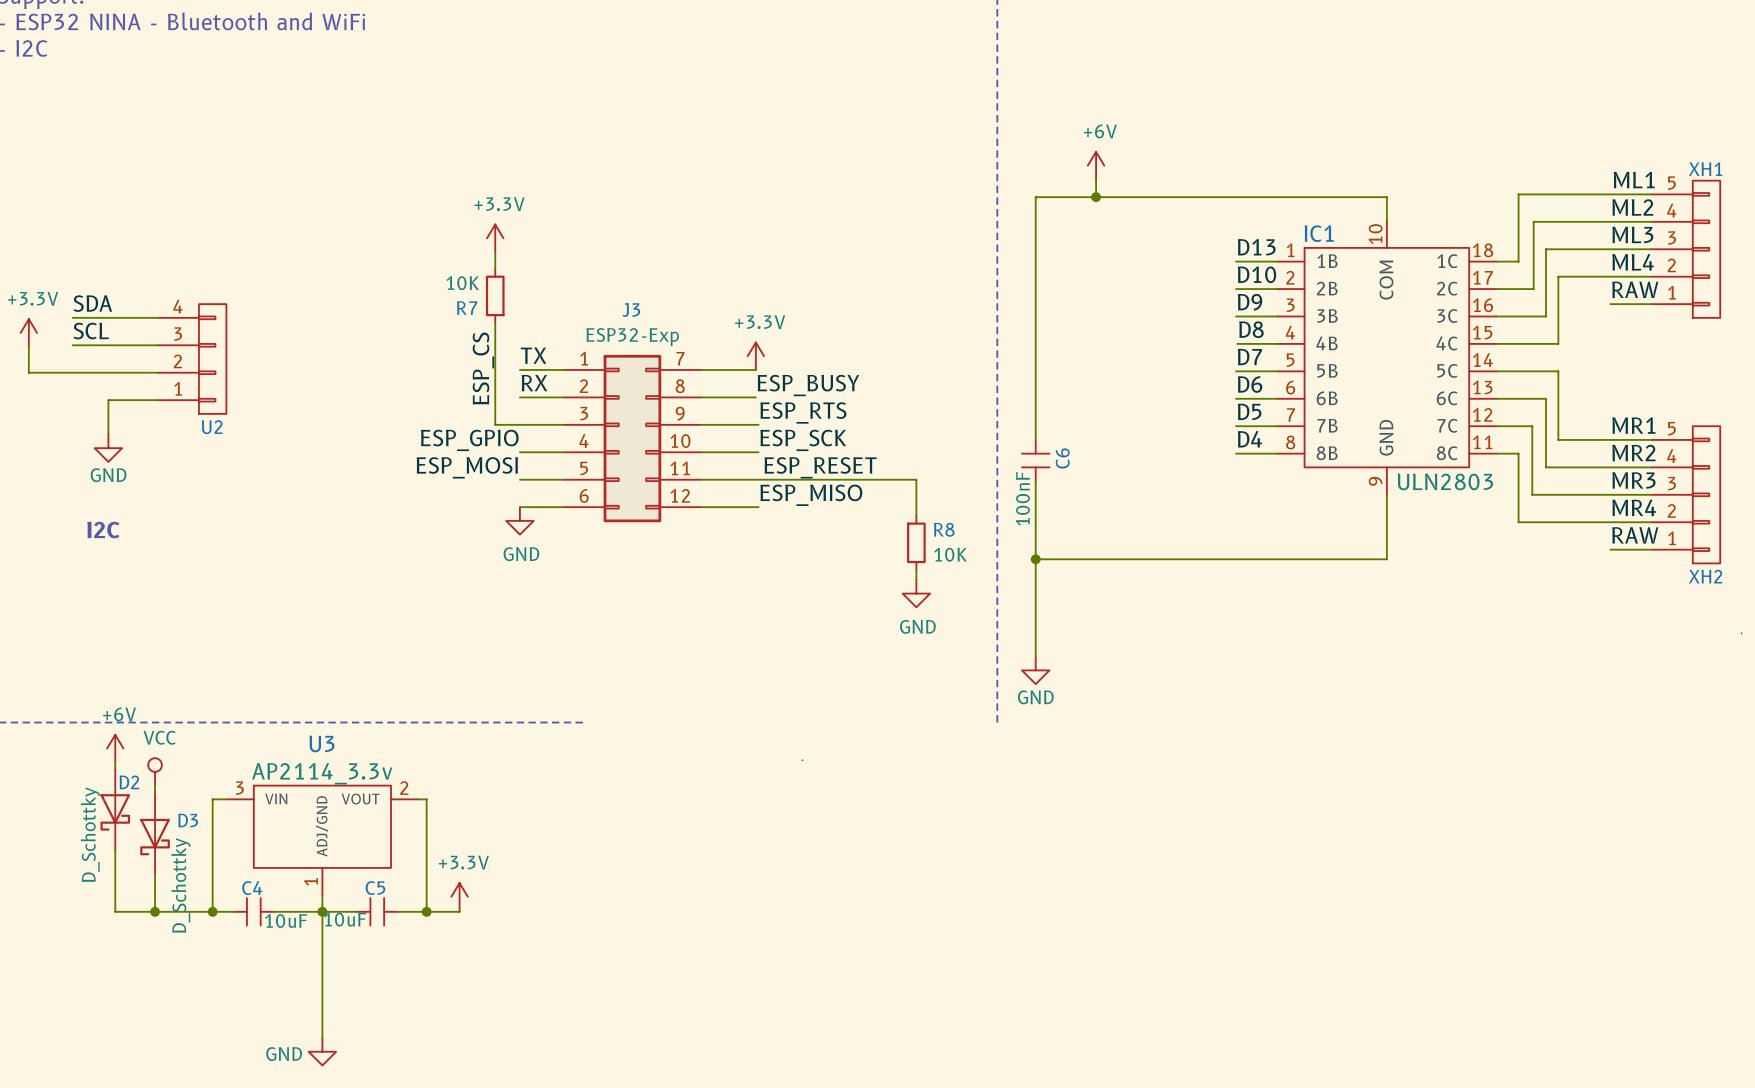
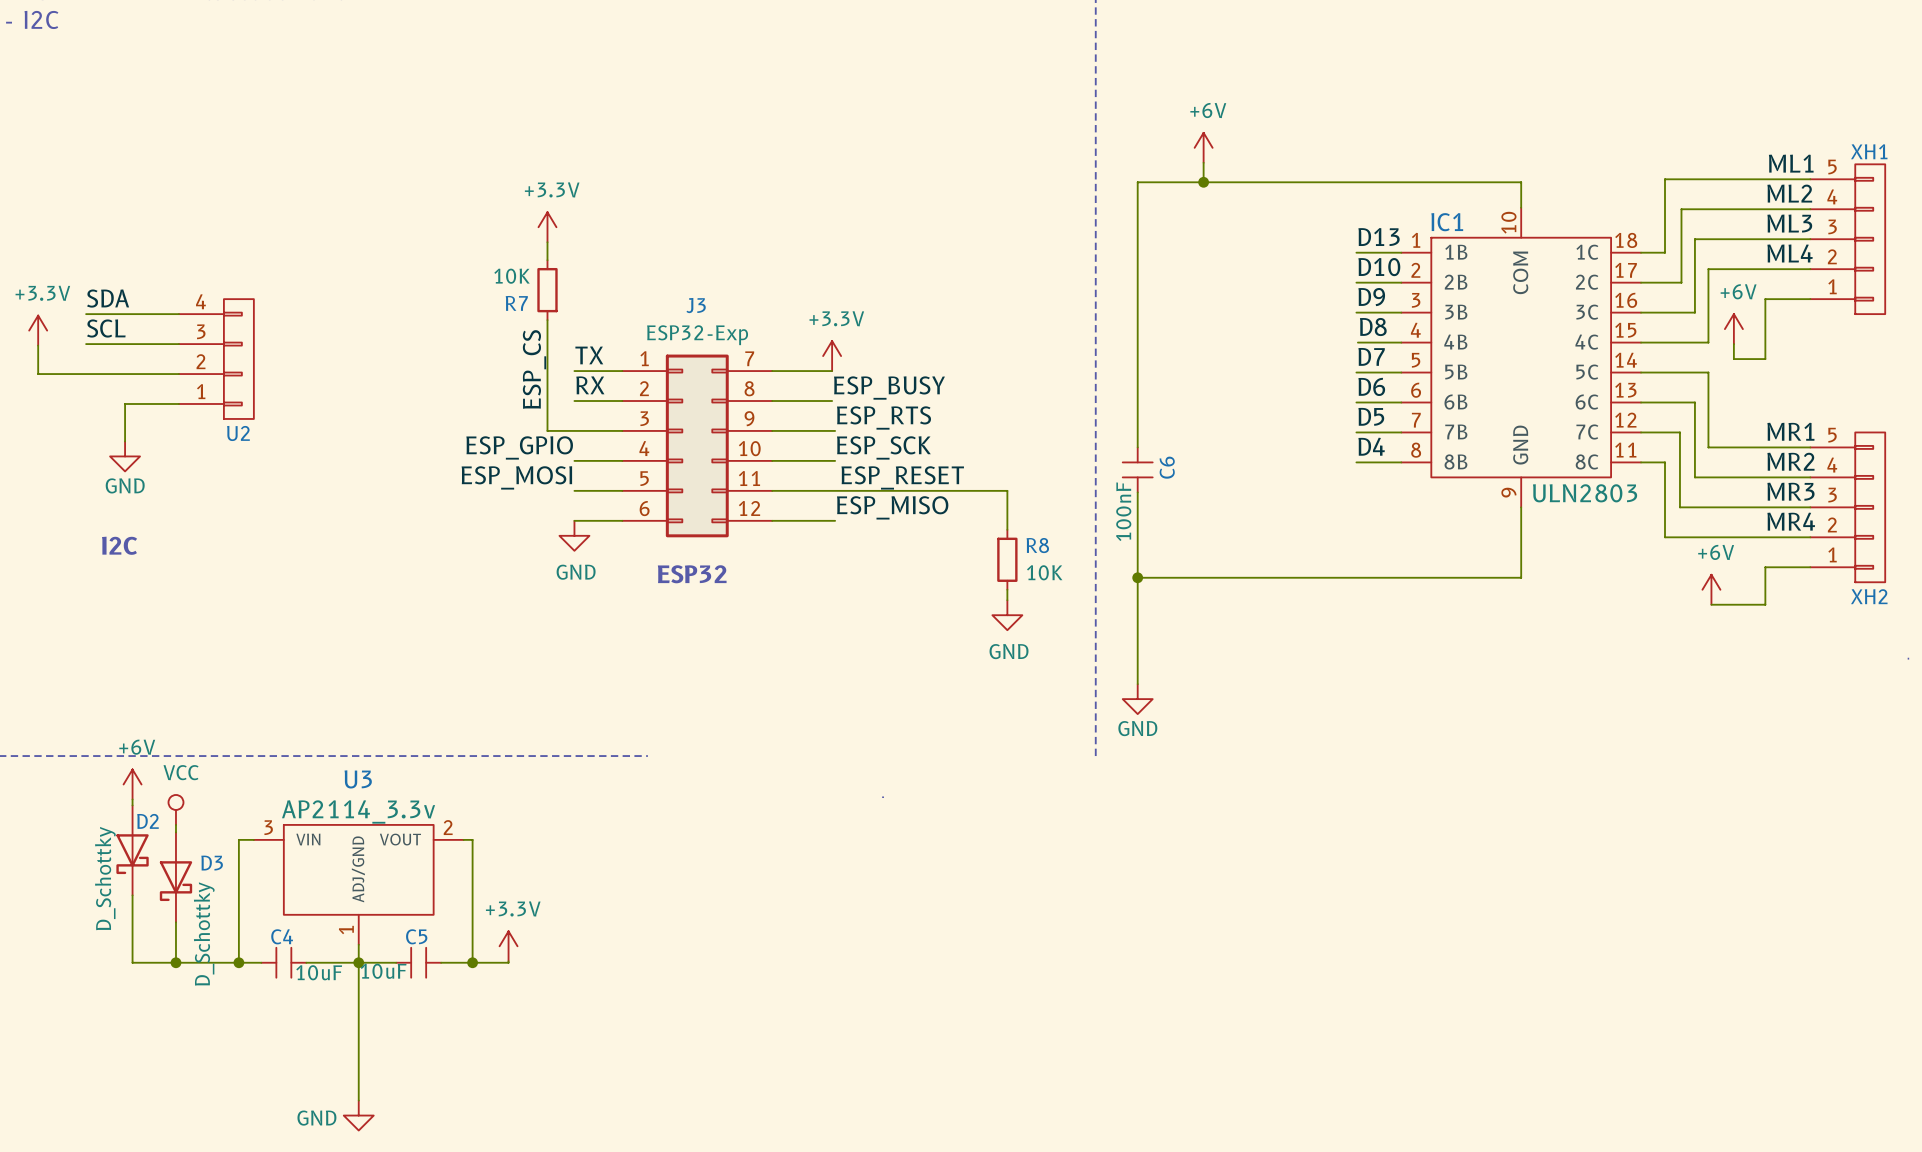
label: RAW (1635, 289) -> none
wire: none -> (1765, 299) (1765, 359) (1733, 359) (1733, 344)
power symbol: none -> +6V (1733, 329)
label: RAW (1635, 535) -> none
wire: none -> (1765, 567) (1765, 604) (1711, 604)
text: none -> ESP32 (692, 574)
power symbol: none -> +6V (1711, 589)

